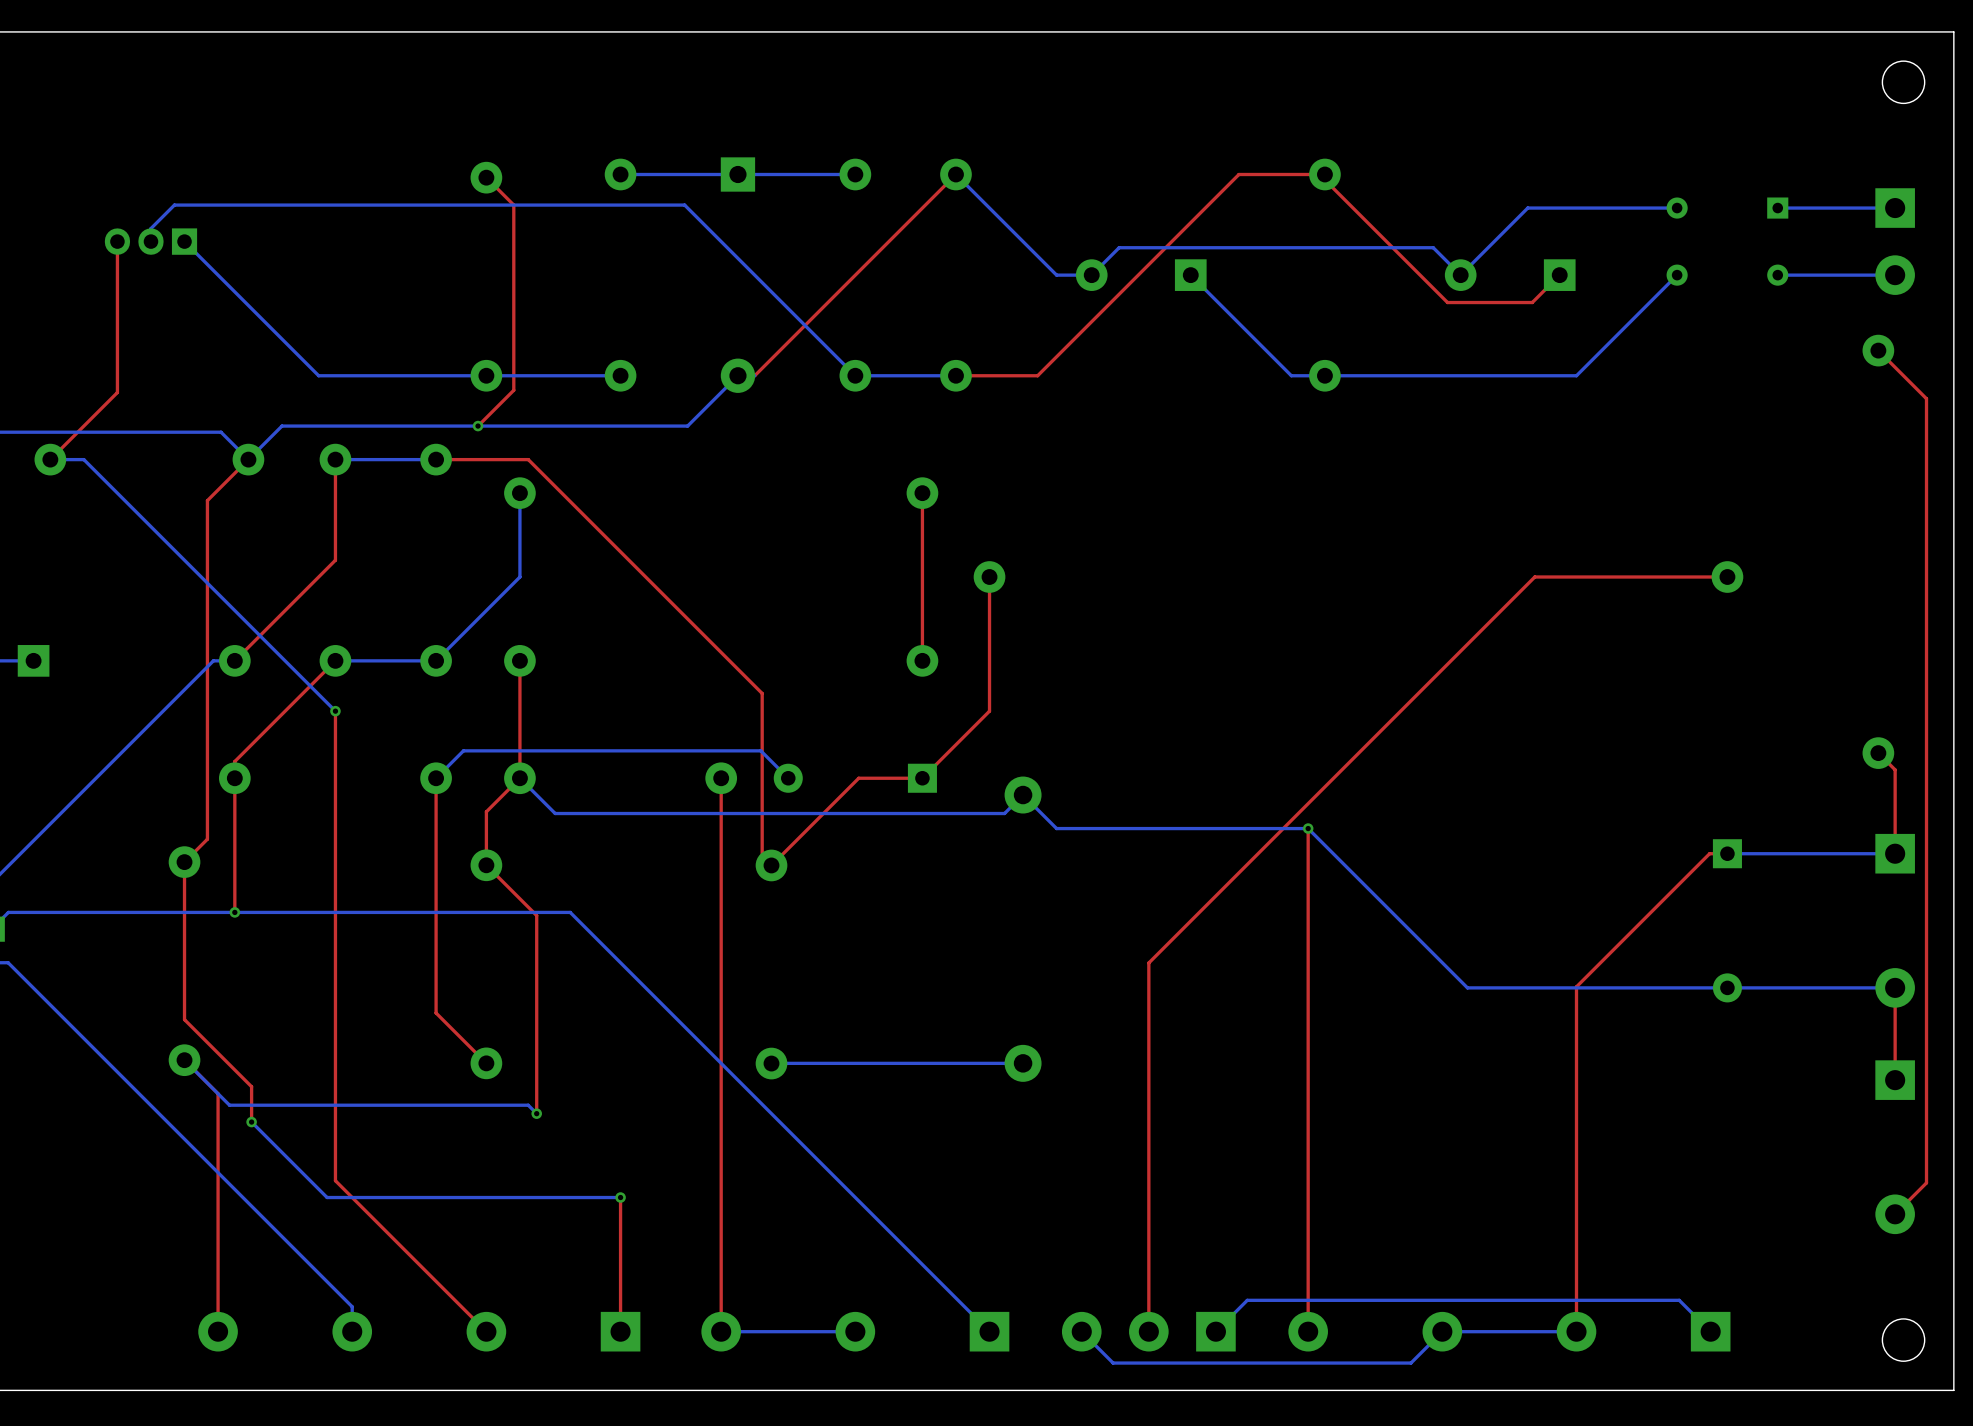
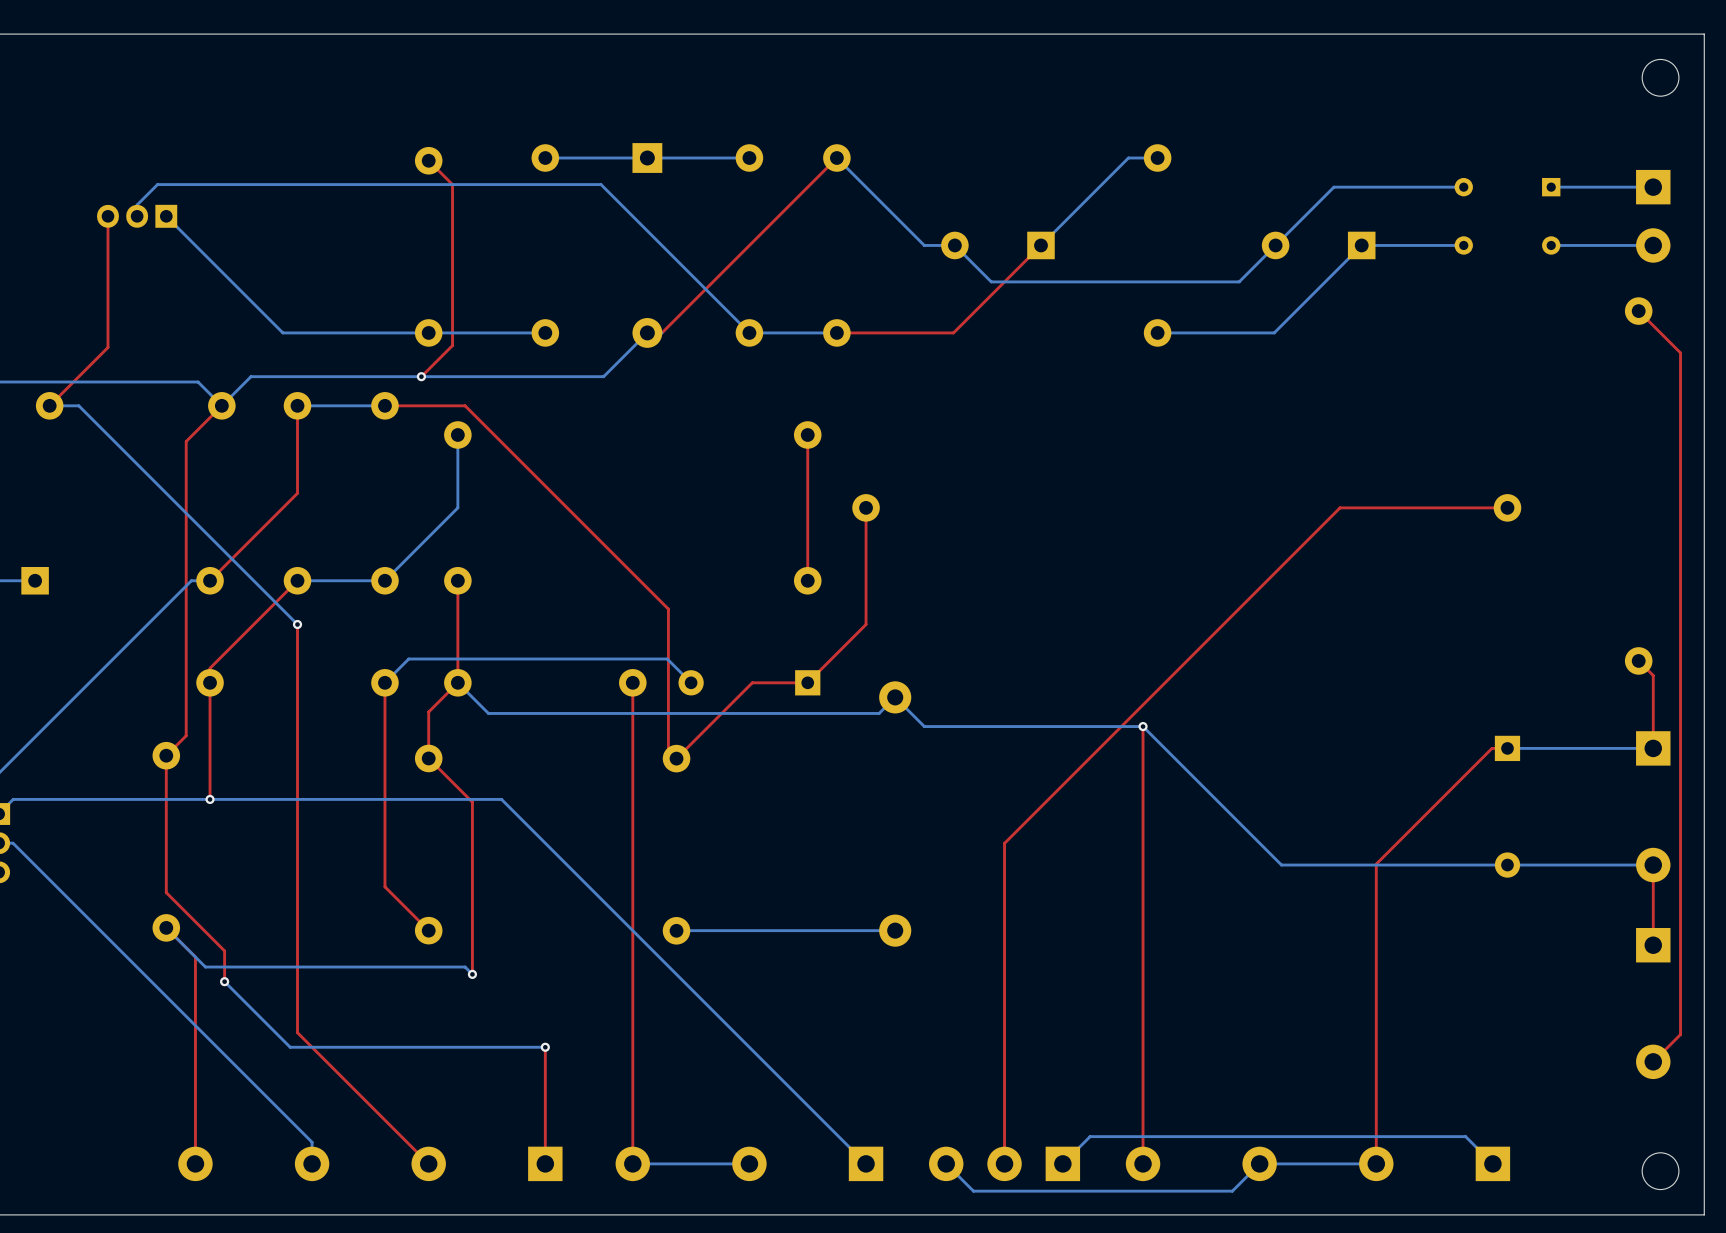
top track: (1324, 174) (1238, 174) (1037, 375) -> (1040, 245) (953, 332) (907, 332)
top track: (1324, 179) (1447, 302) (1532, 302) (1559, 275) -> none
bottom track: (1190, 275) (1291, 375) (1324, 375) -> (1040, 245) (1128, 158) (1157, 158)
bottom track: (1460, 275) (1433, 247) (1119, 247) (1091, 275) -> (1275, 245) (1239, 281) (991, 281) (954, 245)
bottom track: (1677, 275) (1576, 375) (1459, 375) -> (1463, 245) (1361, 245) (1274, 332)

